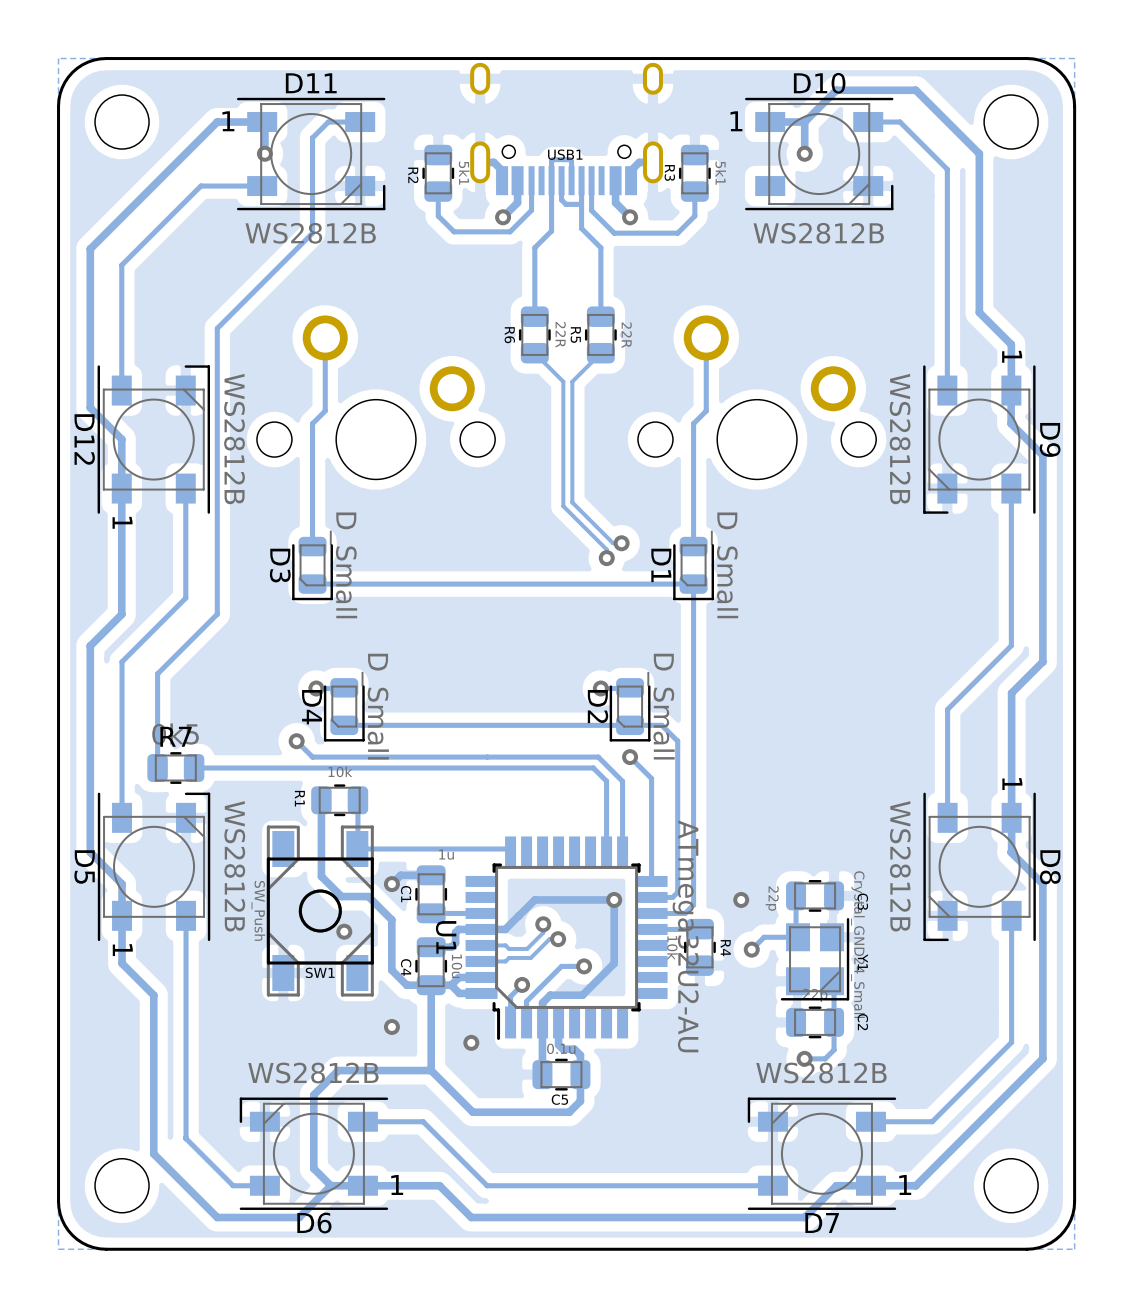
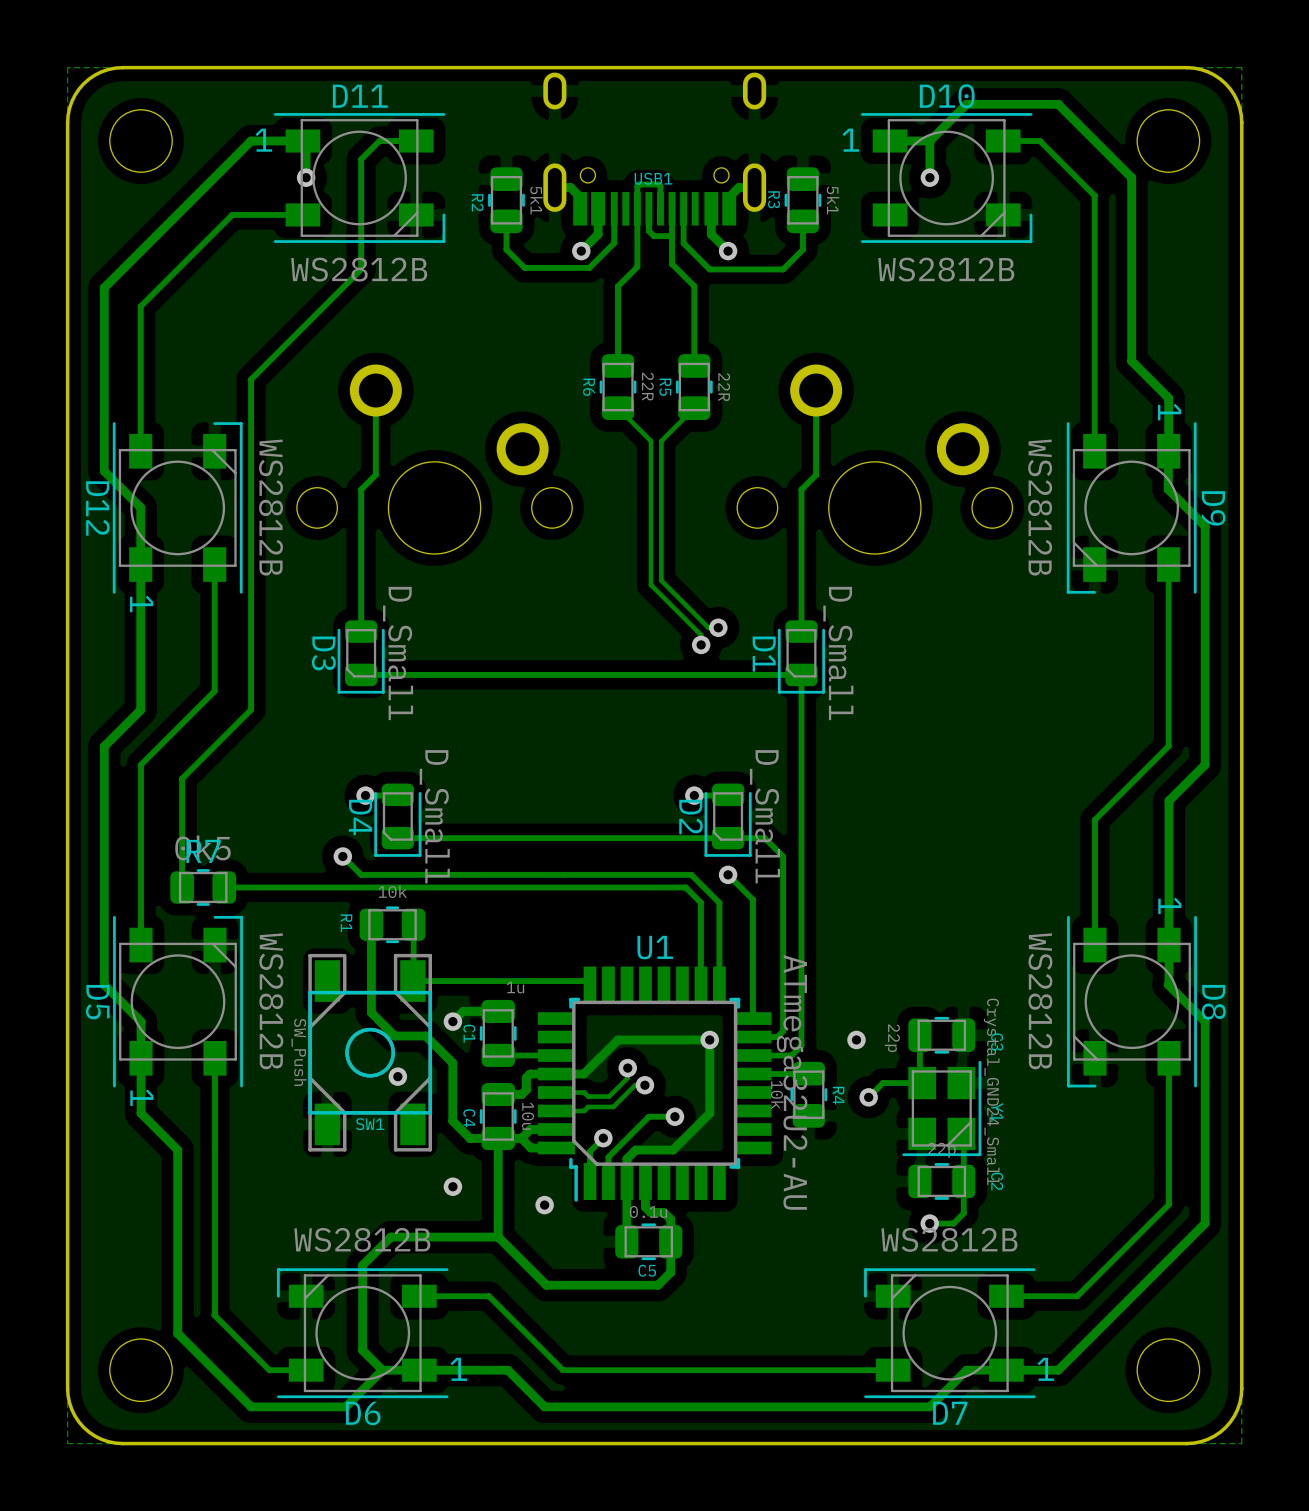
U1 name rotation: 0° (446, 937) -> 90° counterclockwise (655, 947)
U1 name position: U1 (446, 937) -> U1 (655, 947)

